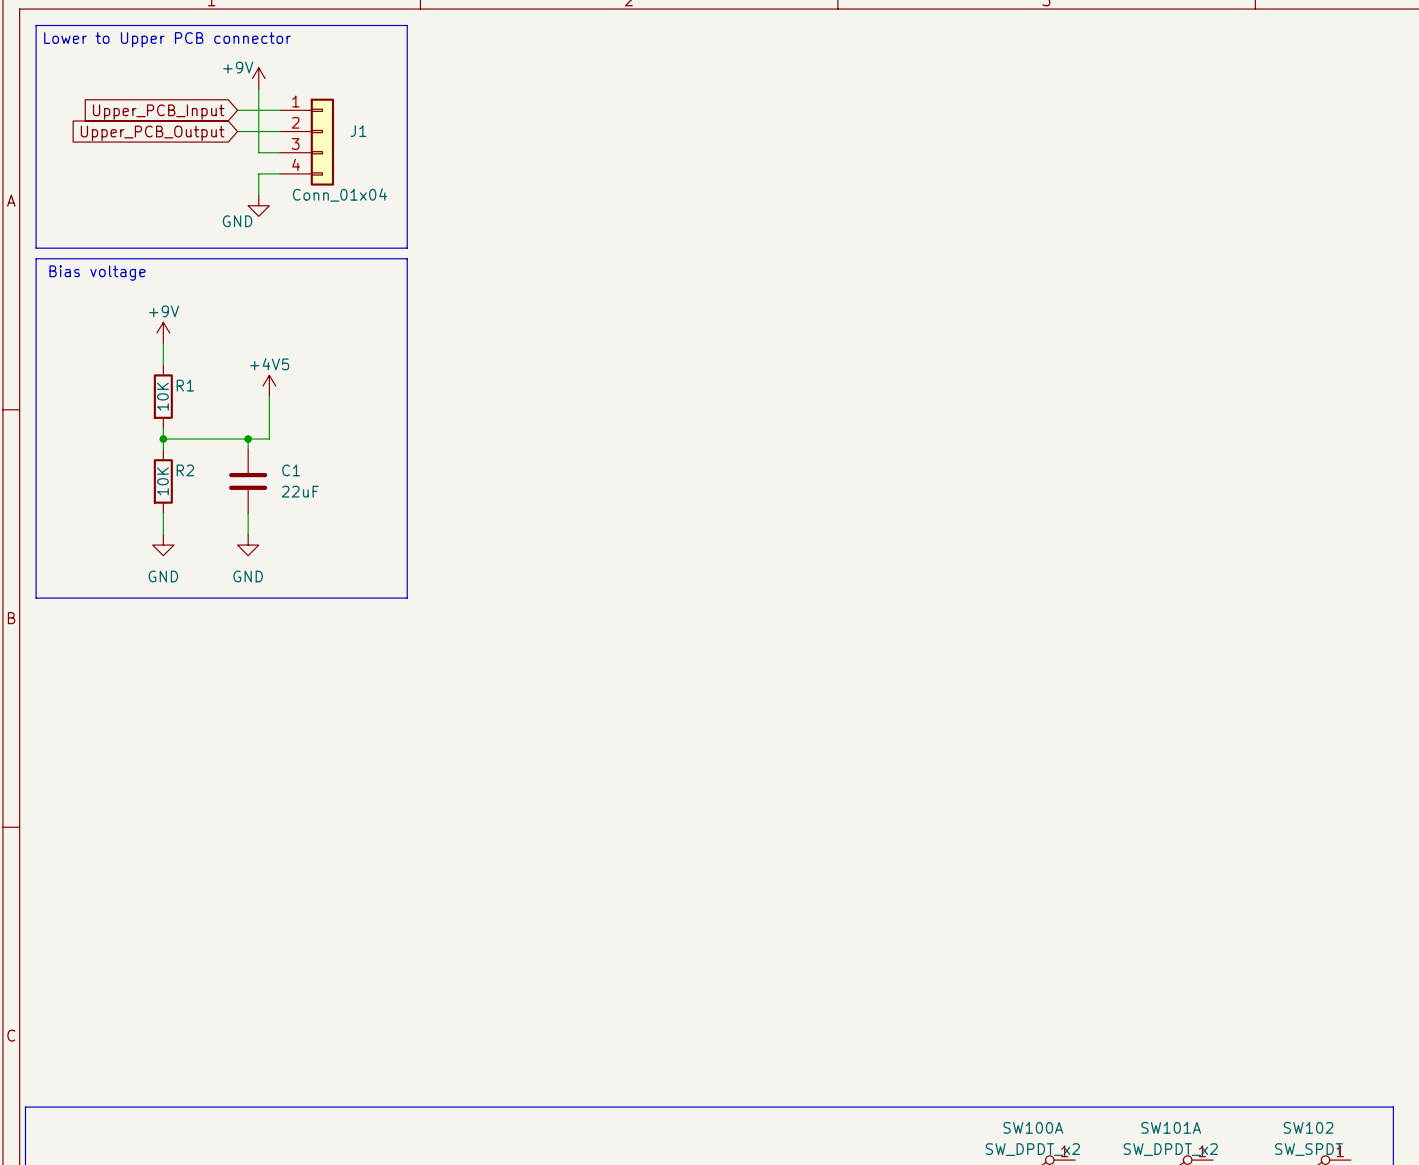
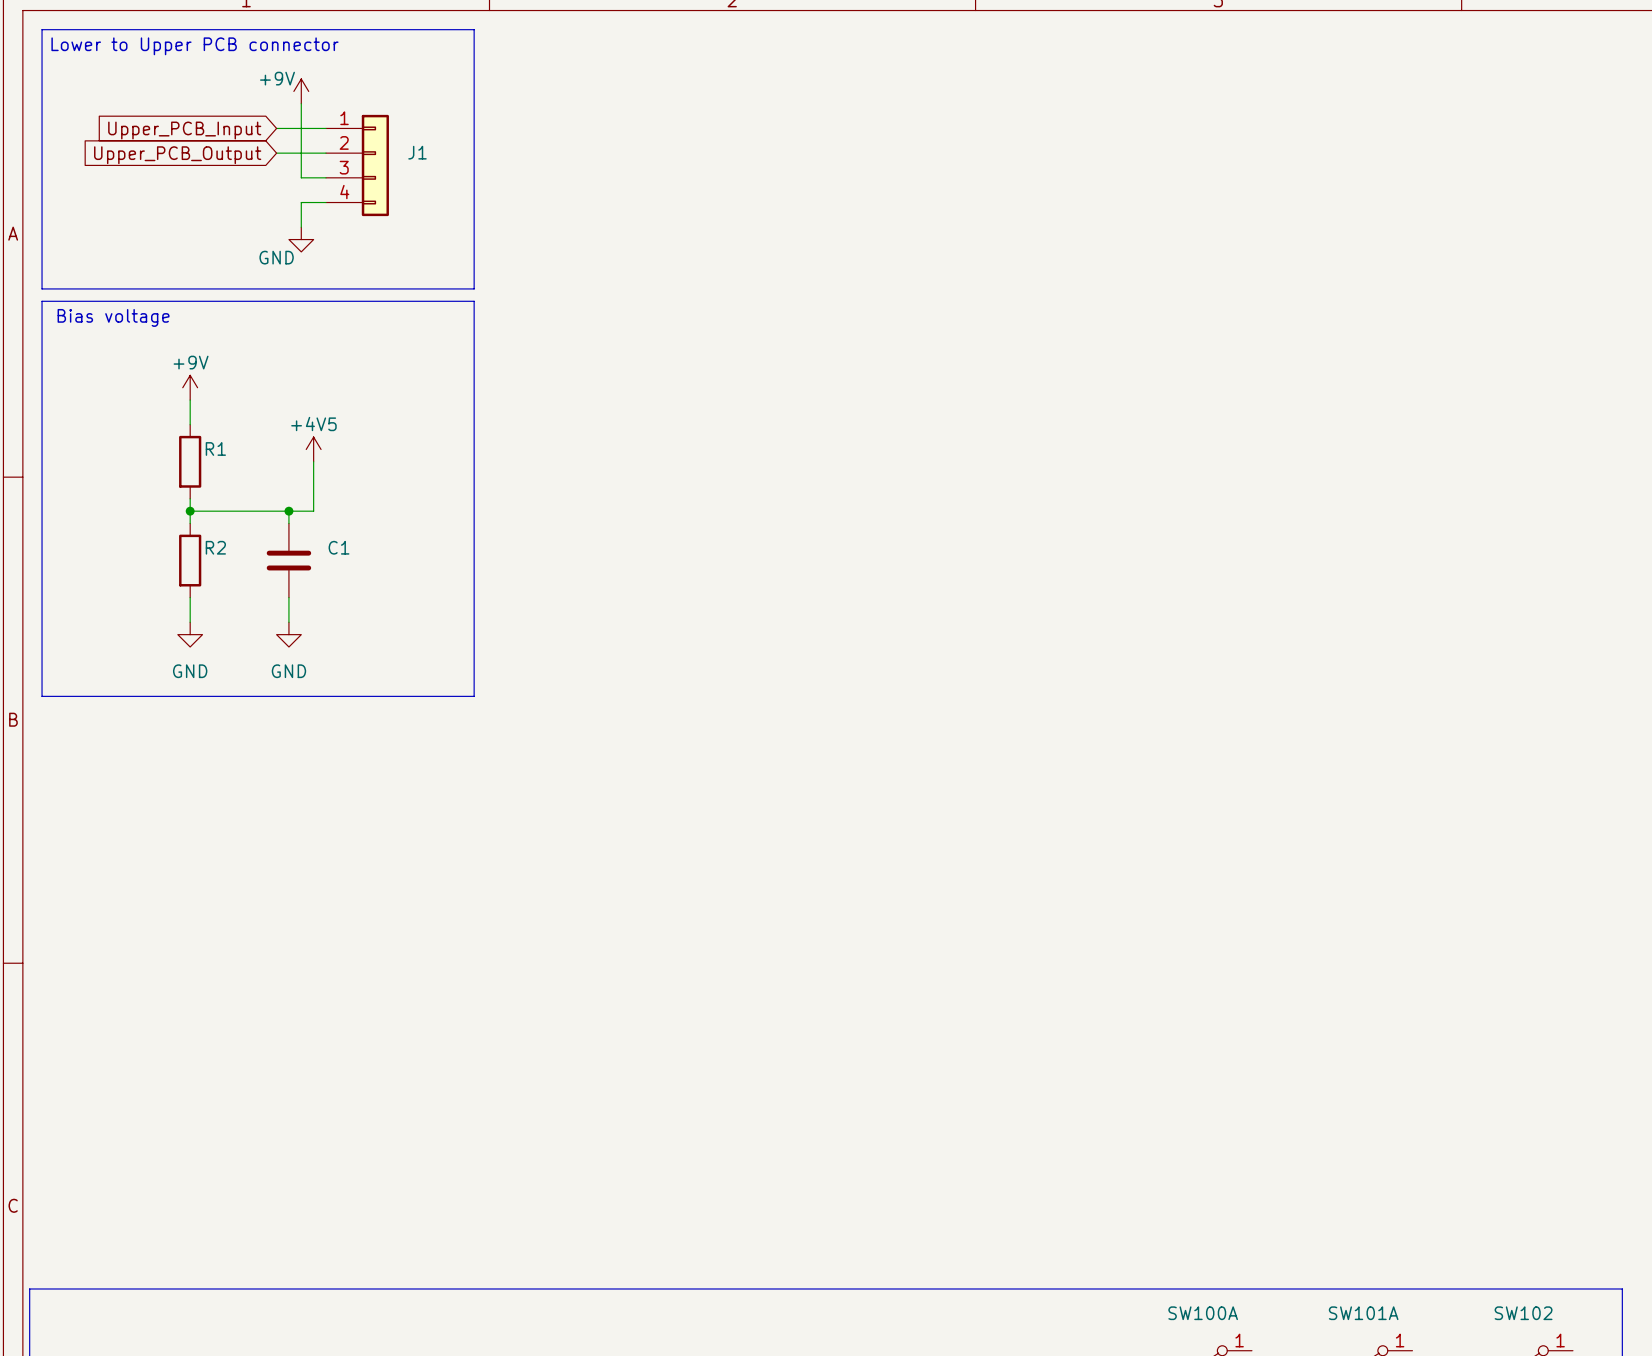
J1 value: Conn_01x04 (339, 195) -> none
R1 value: 10K (162, 396) -> none
R2 value: 10K (162, 481) -> none
C1 value: 22uF (300, 491) -> none
SW100A value: SW_DPDT_x2 (1032, 1149) -> none
SW101A value: SW_DPDT_x2 (1170, 1149) -> none
SW102 value: SW_SPDT (1309, 1149) -> none

